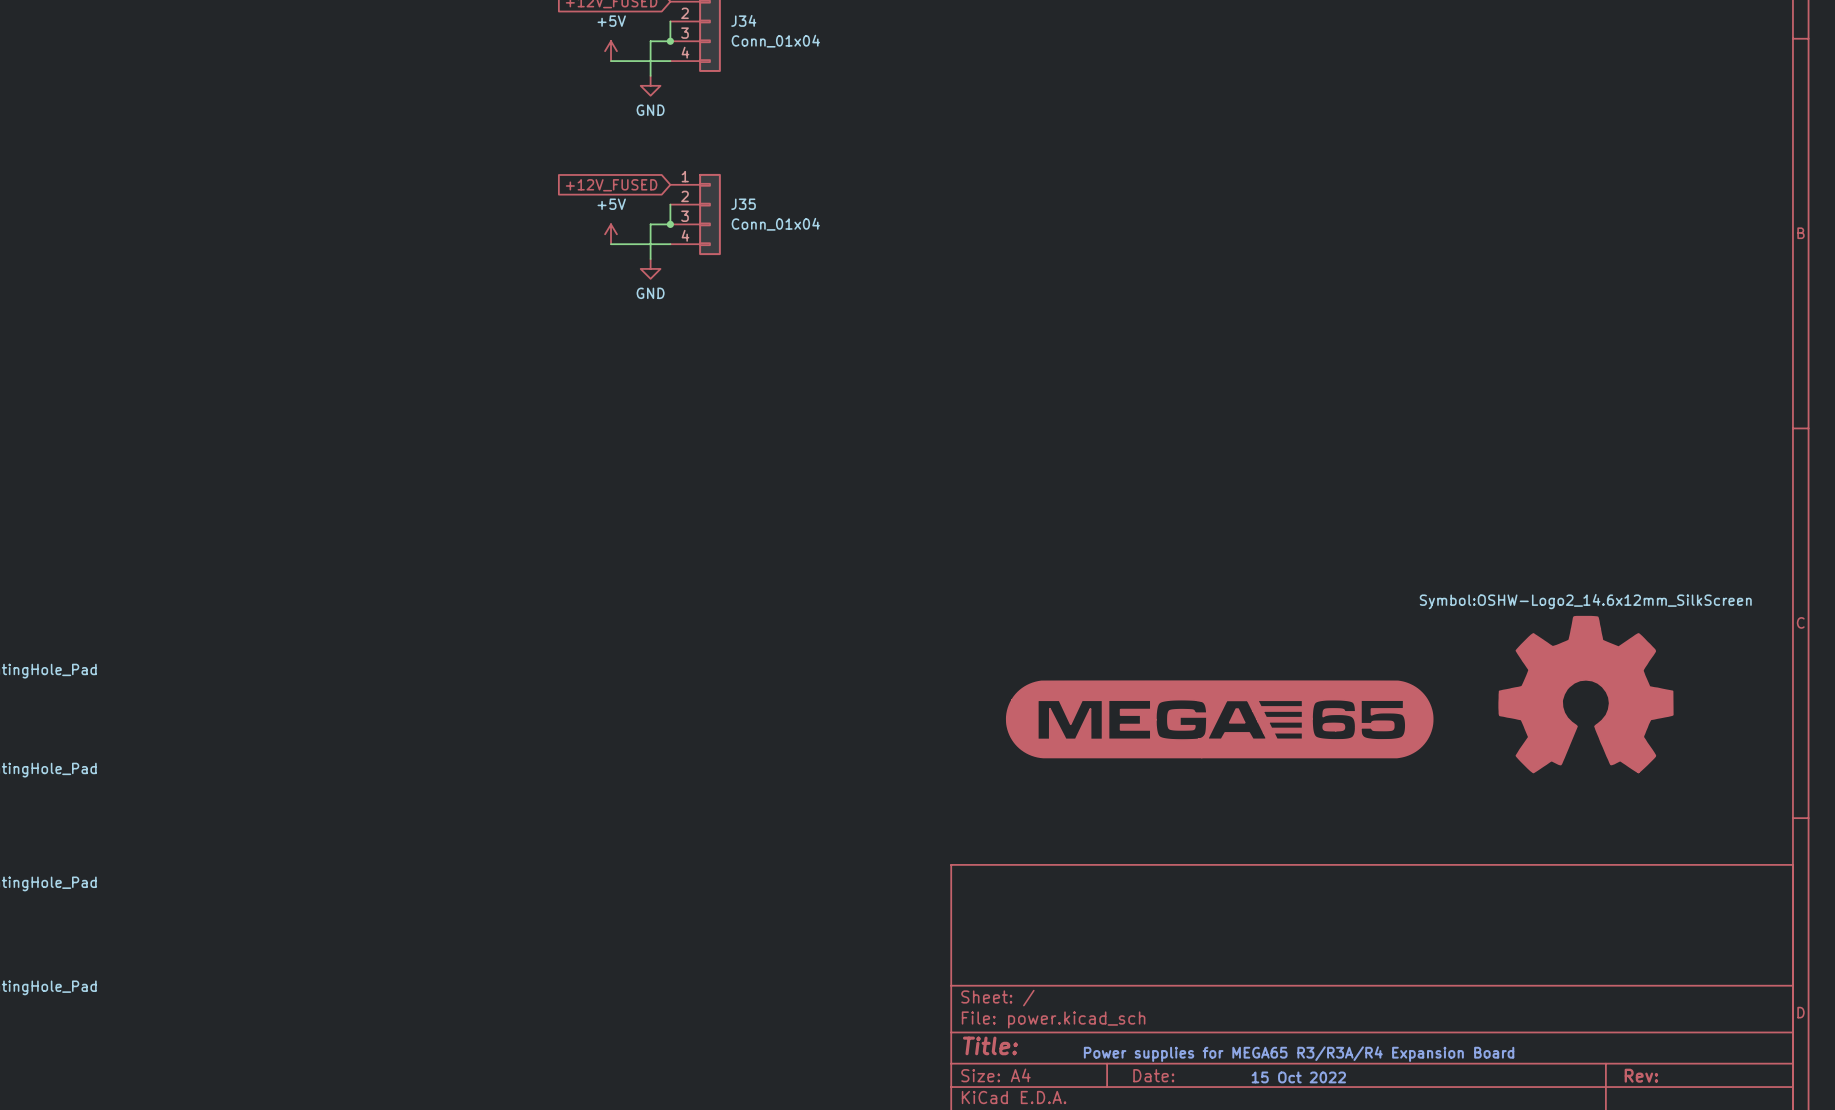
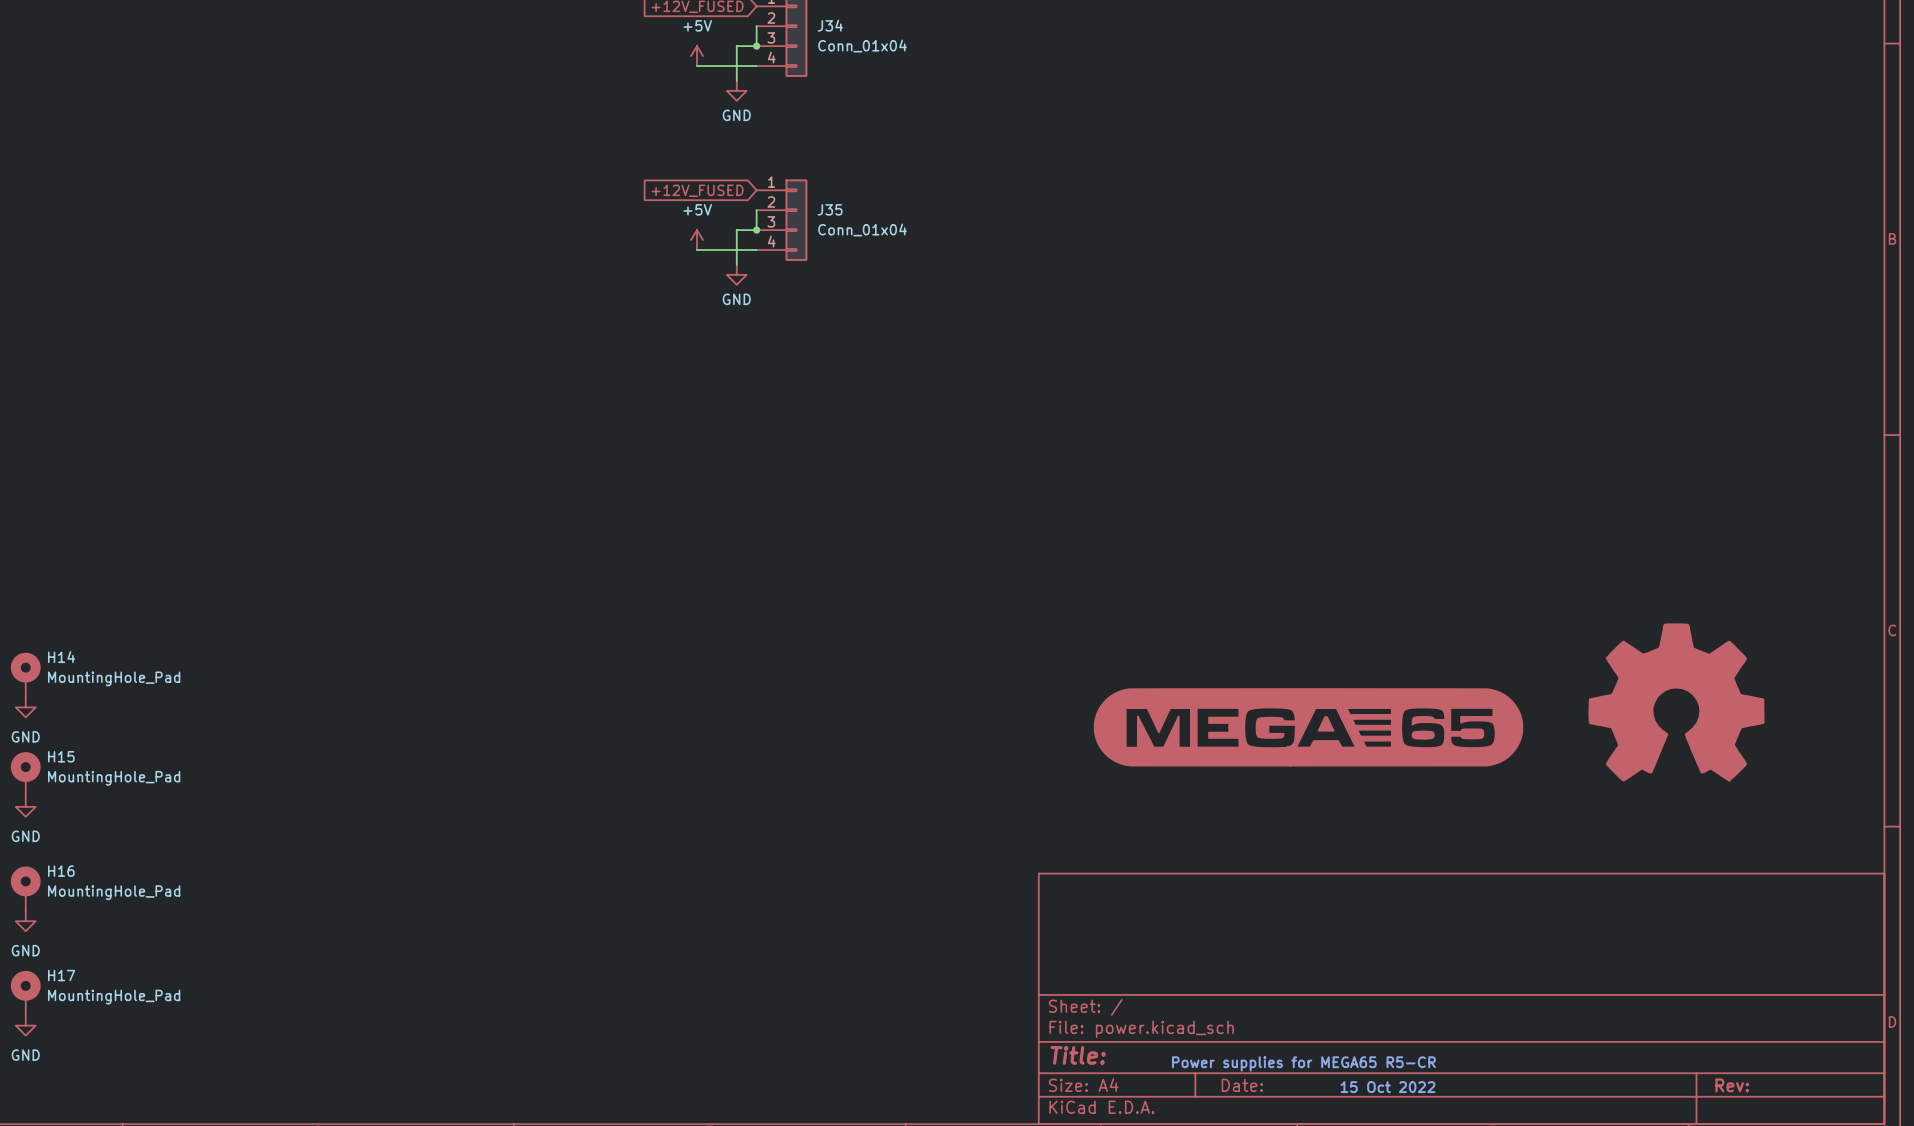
part: (1585, 694) -> none
text: Power supplies for MEGA65 R3/R3A/R4 Expansion Board (1299, 1054) -> Power supplies for MEGA65 R5-CR (1303, 1063)

